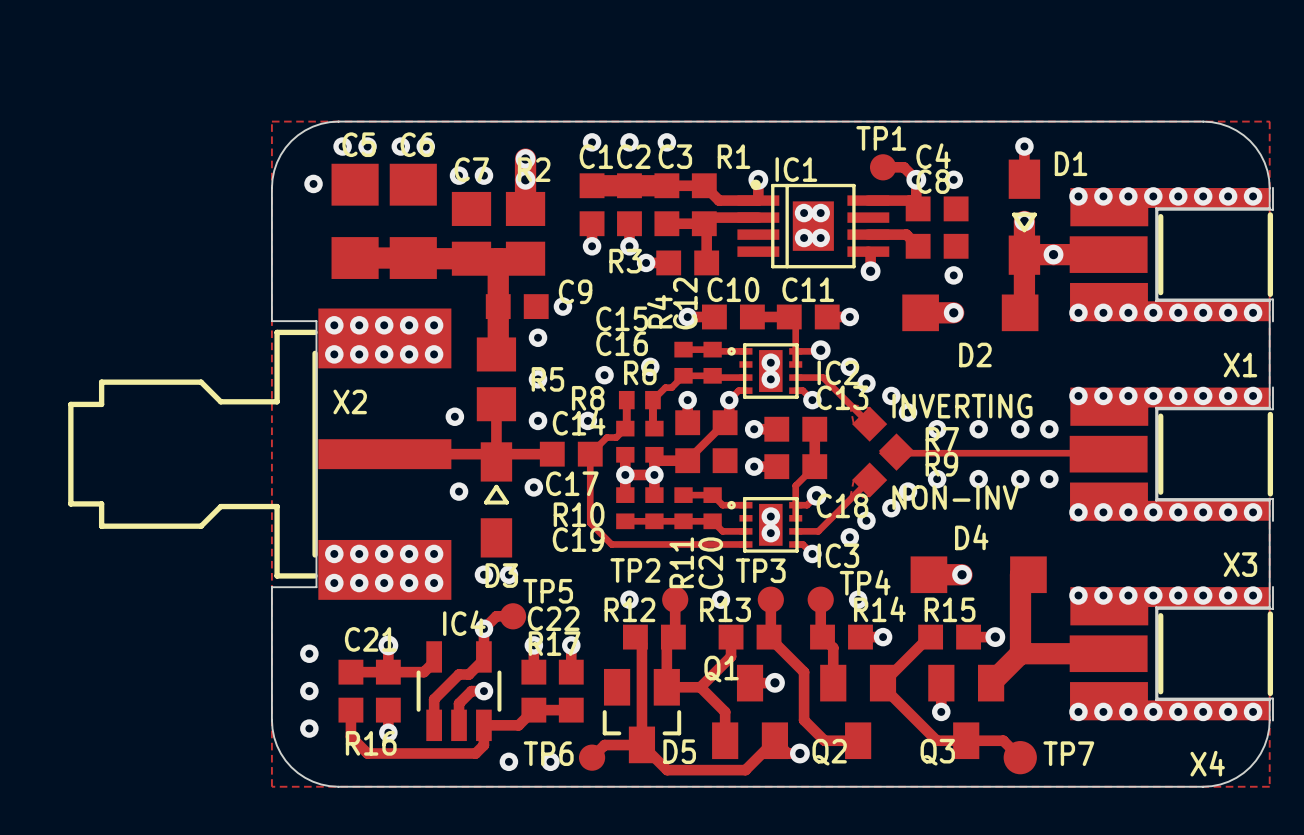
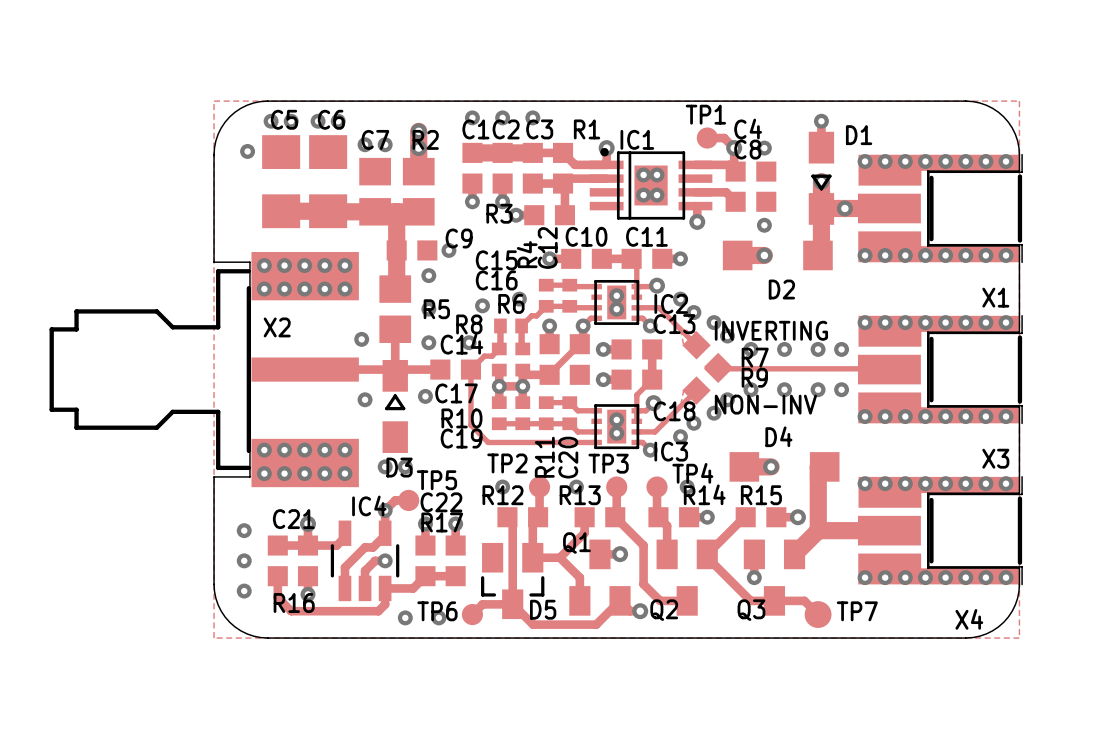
IC2 footprint: [727, 343, 803, 399] -> [591, 279, 643, 325]
IC3 footprint: [727, 496, 803, 553] -> [591, 404, 643, 450]

